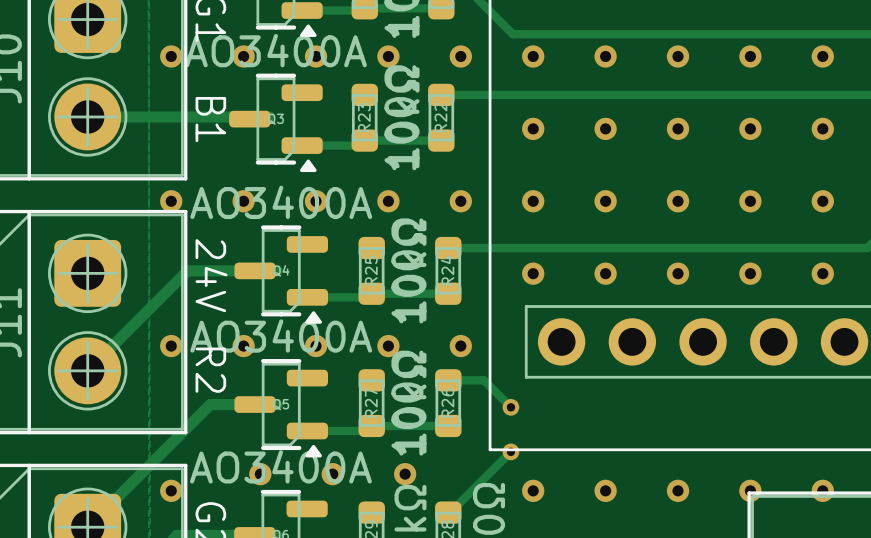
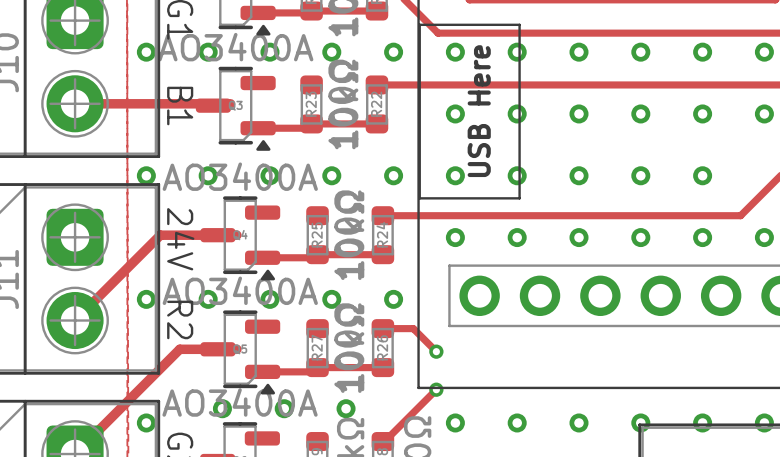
line: none -> (419, 24) (519, 24) (519, 198) (419, 198) (419, 24)
text: none -> USB Here (479, 111)

